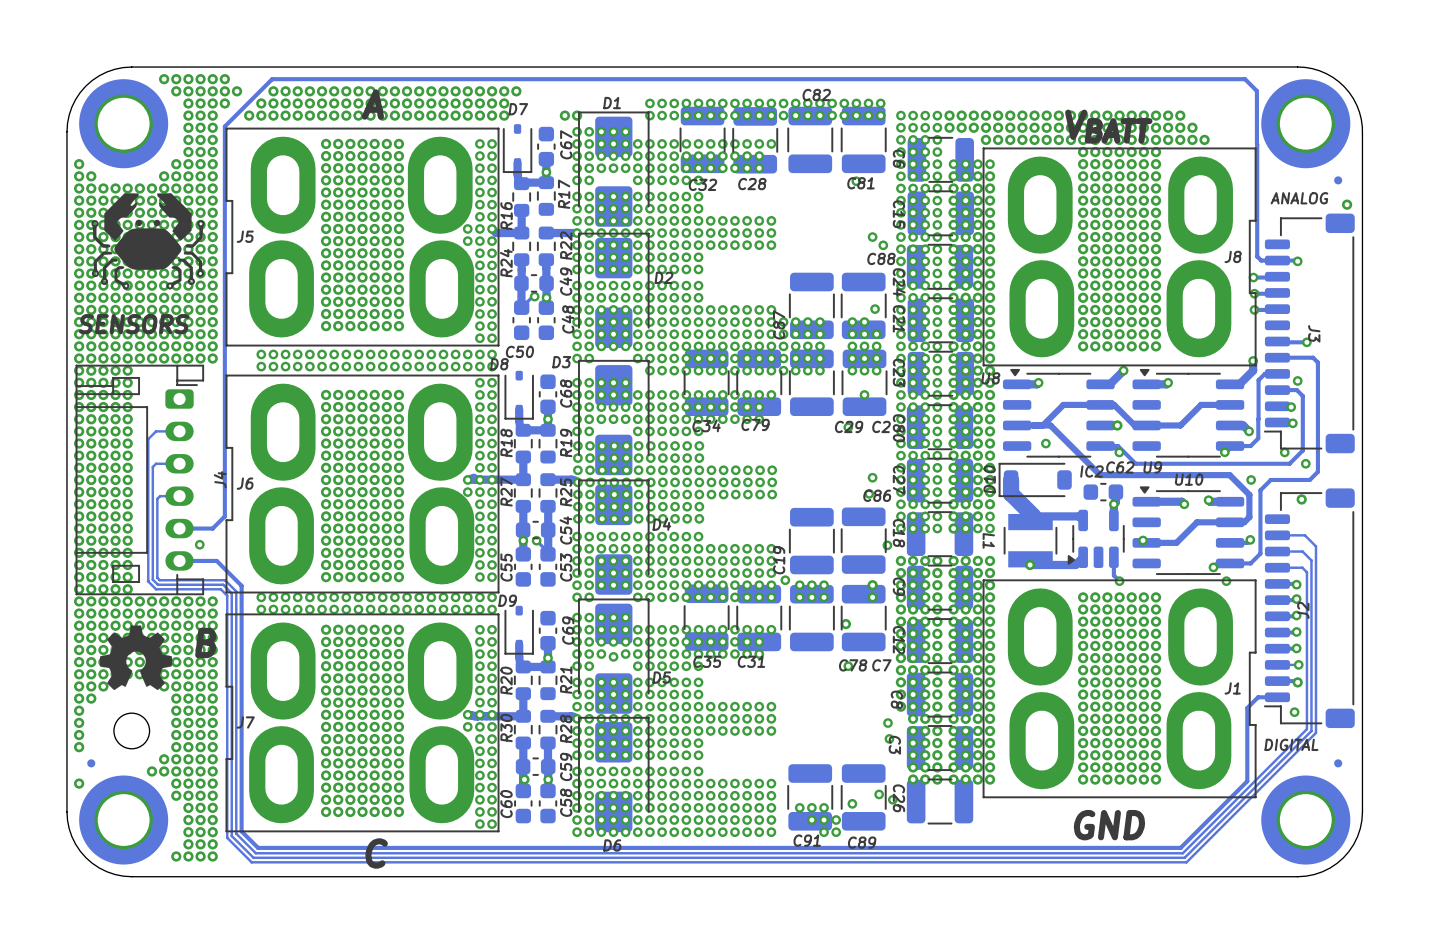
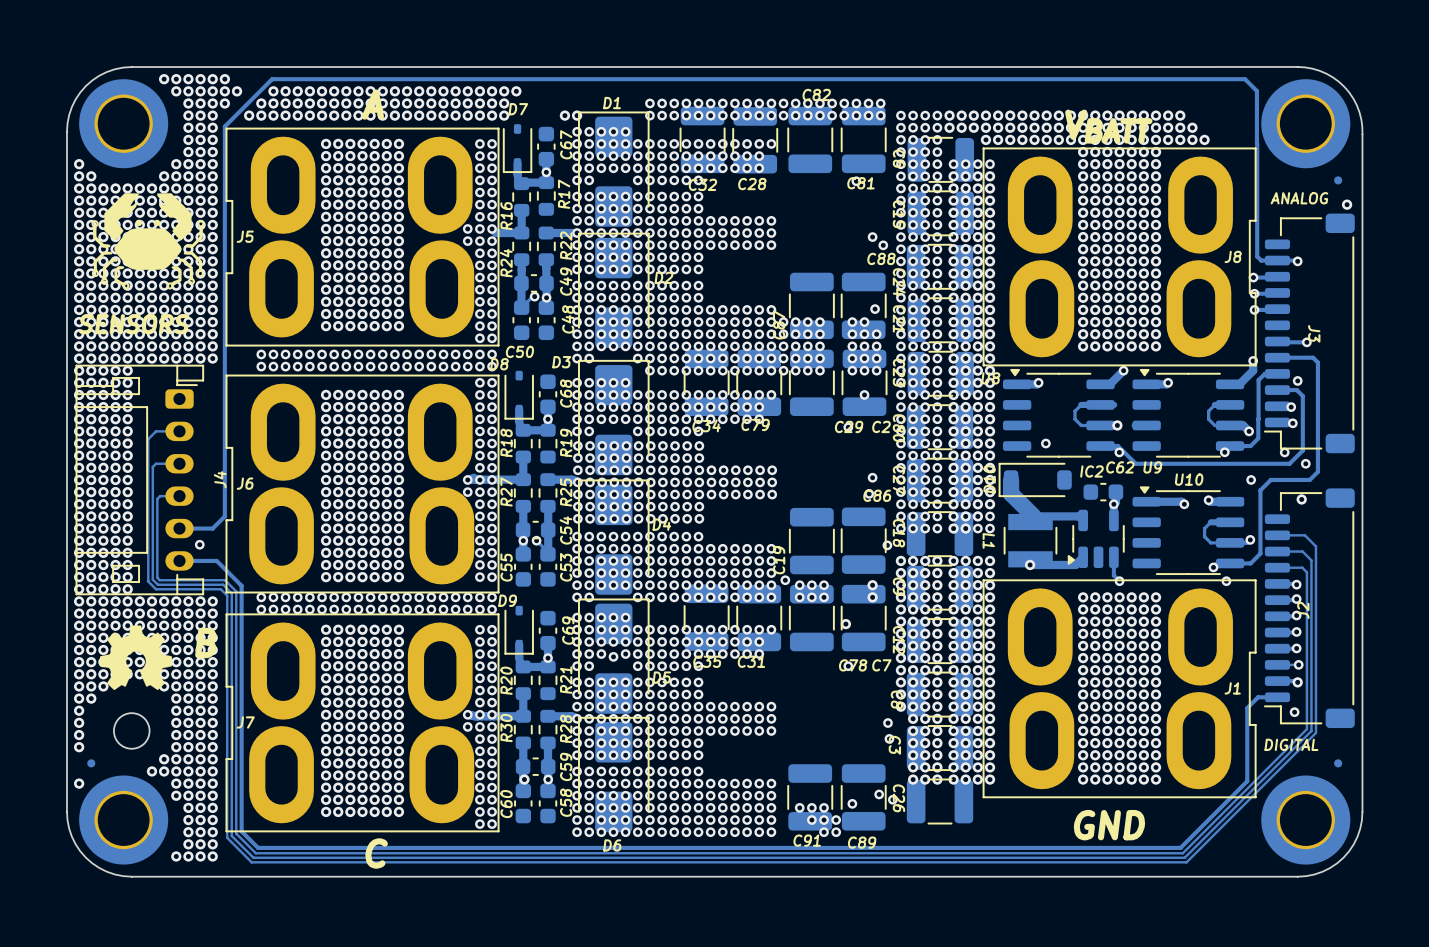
track: (1081, 404) (1063, 404) (1042, 425) -> (1081, 404) (1075, 411) (1075, 419) (1081, 425) (1100, 425)
track: (1114, 404) (1134, 425) -> none
track: (1214, 404) (1201, 404) (1180, 425) (1146, 425) -> (1214, 404) (1208, 411) (1208, 419) (1214, 425) (1230, 425)
track: (1017, 425) (1050, 425) (1100, 475) (1229, 475) (1249, 494) (1249, 517) (1244, 522) (1230, 522) -> none
track: (1210, 522) (1197, 522) (1176, 542) (1146, 542) -> (1210, 522) (1204, 528) (1204, 536) (1210, 542) (1230, 542)
via: (1143, 540) -> none

